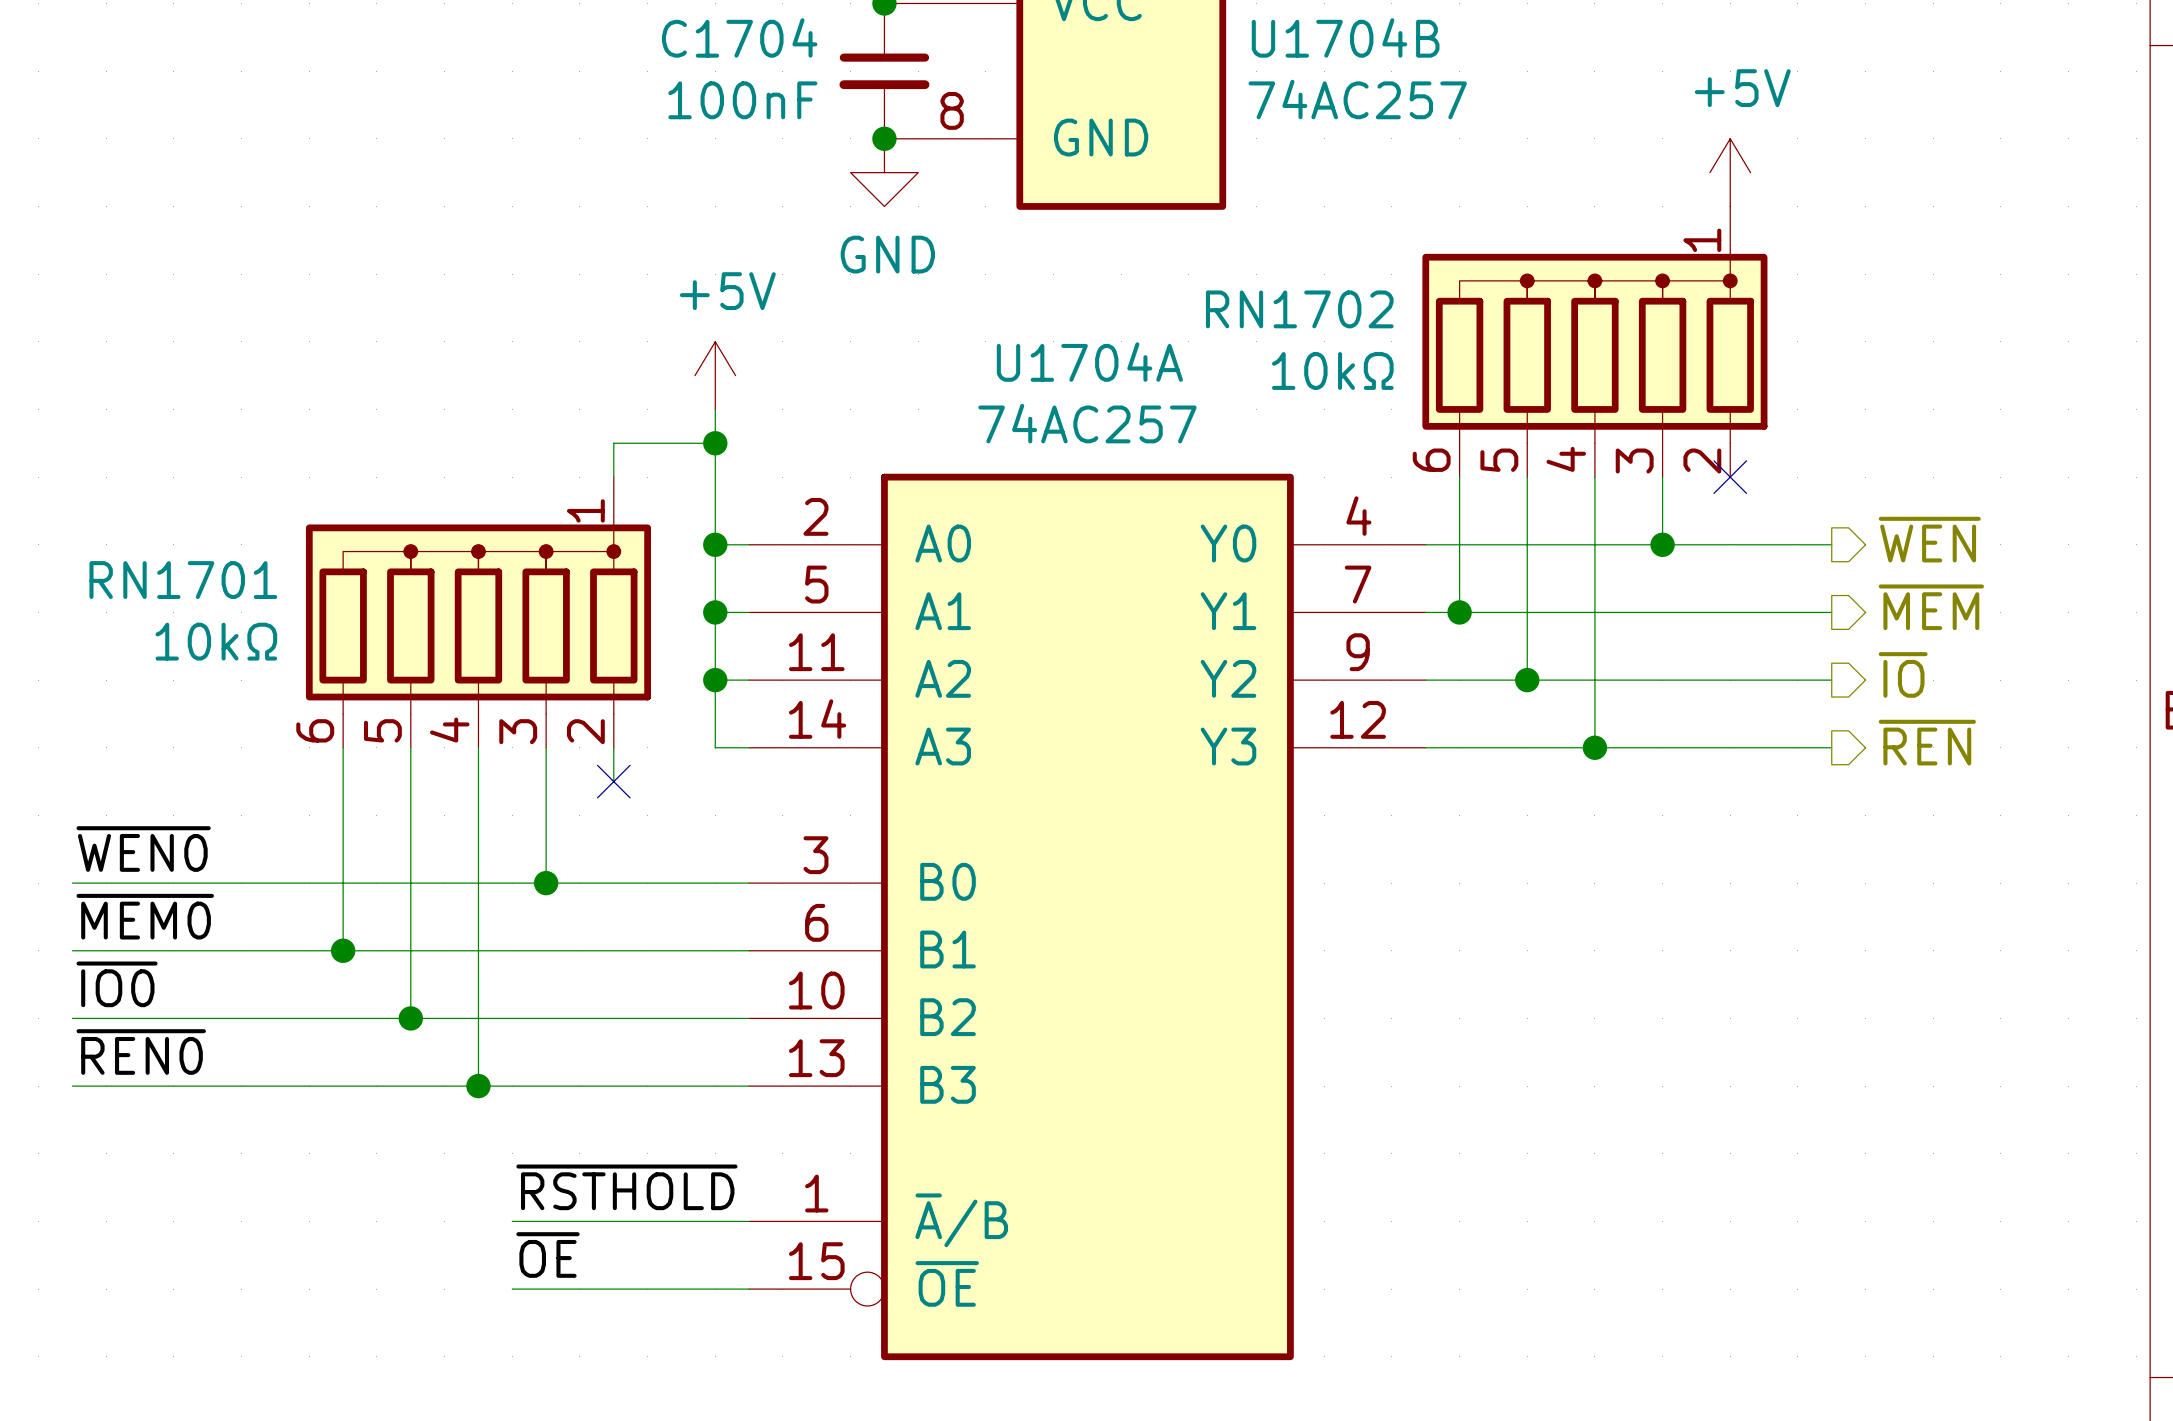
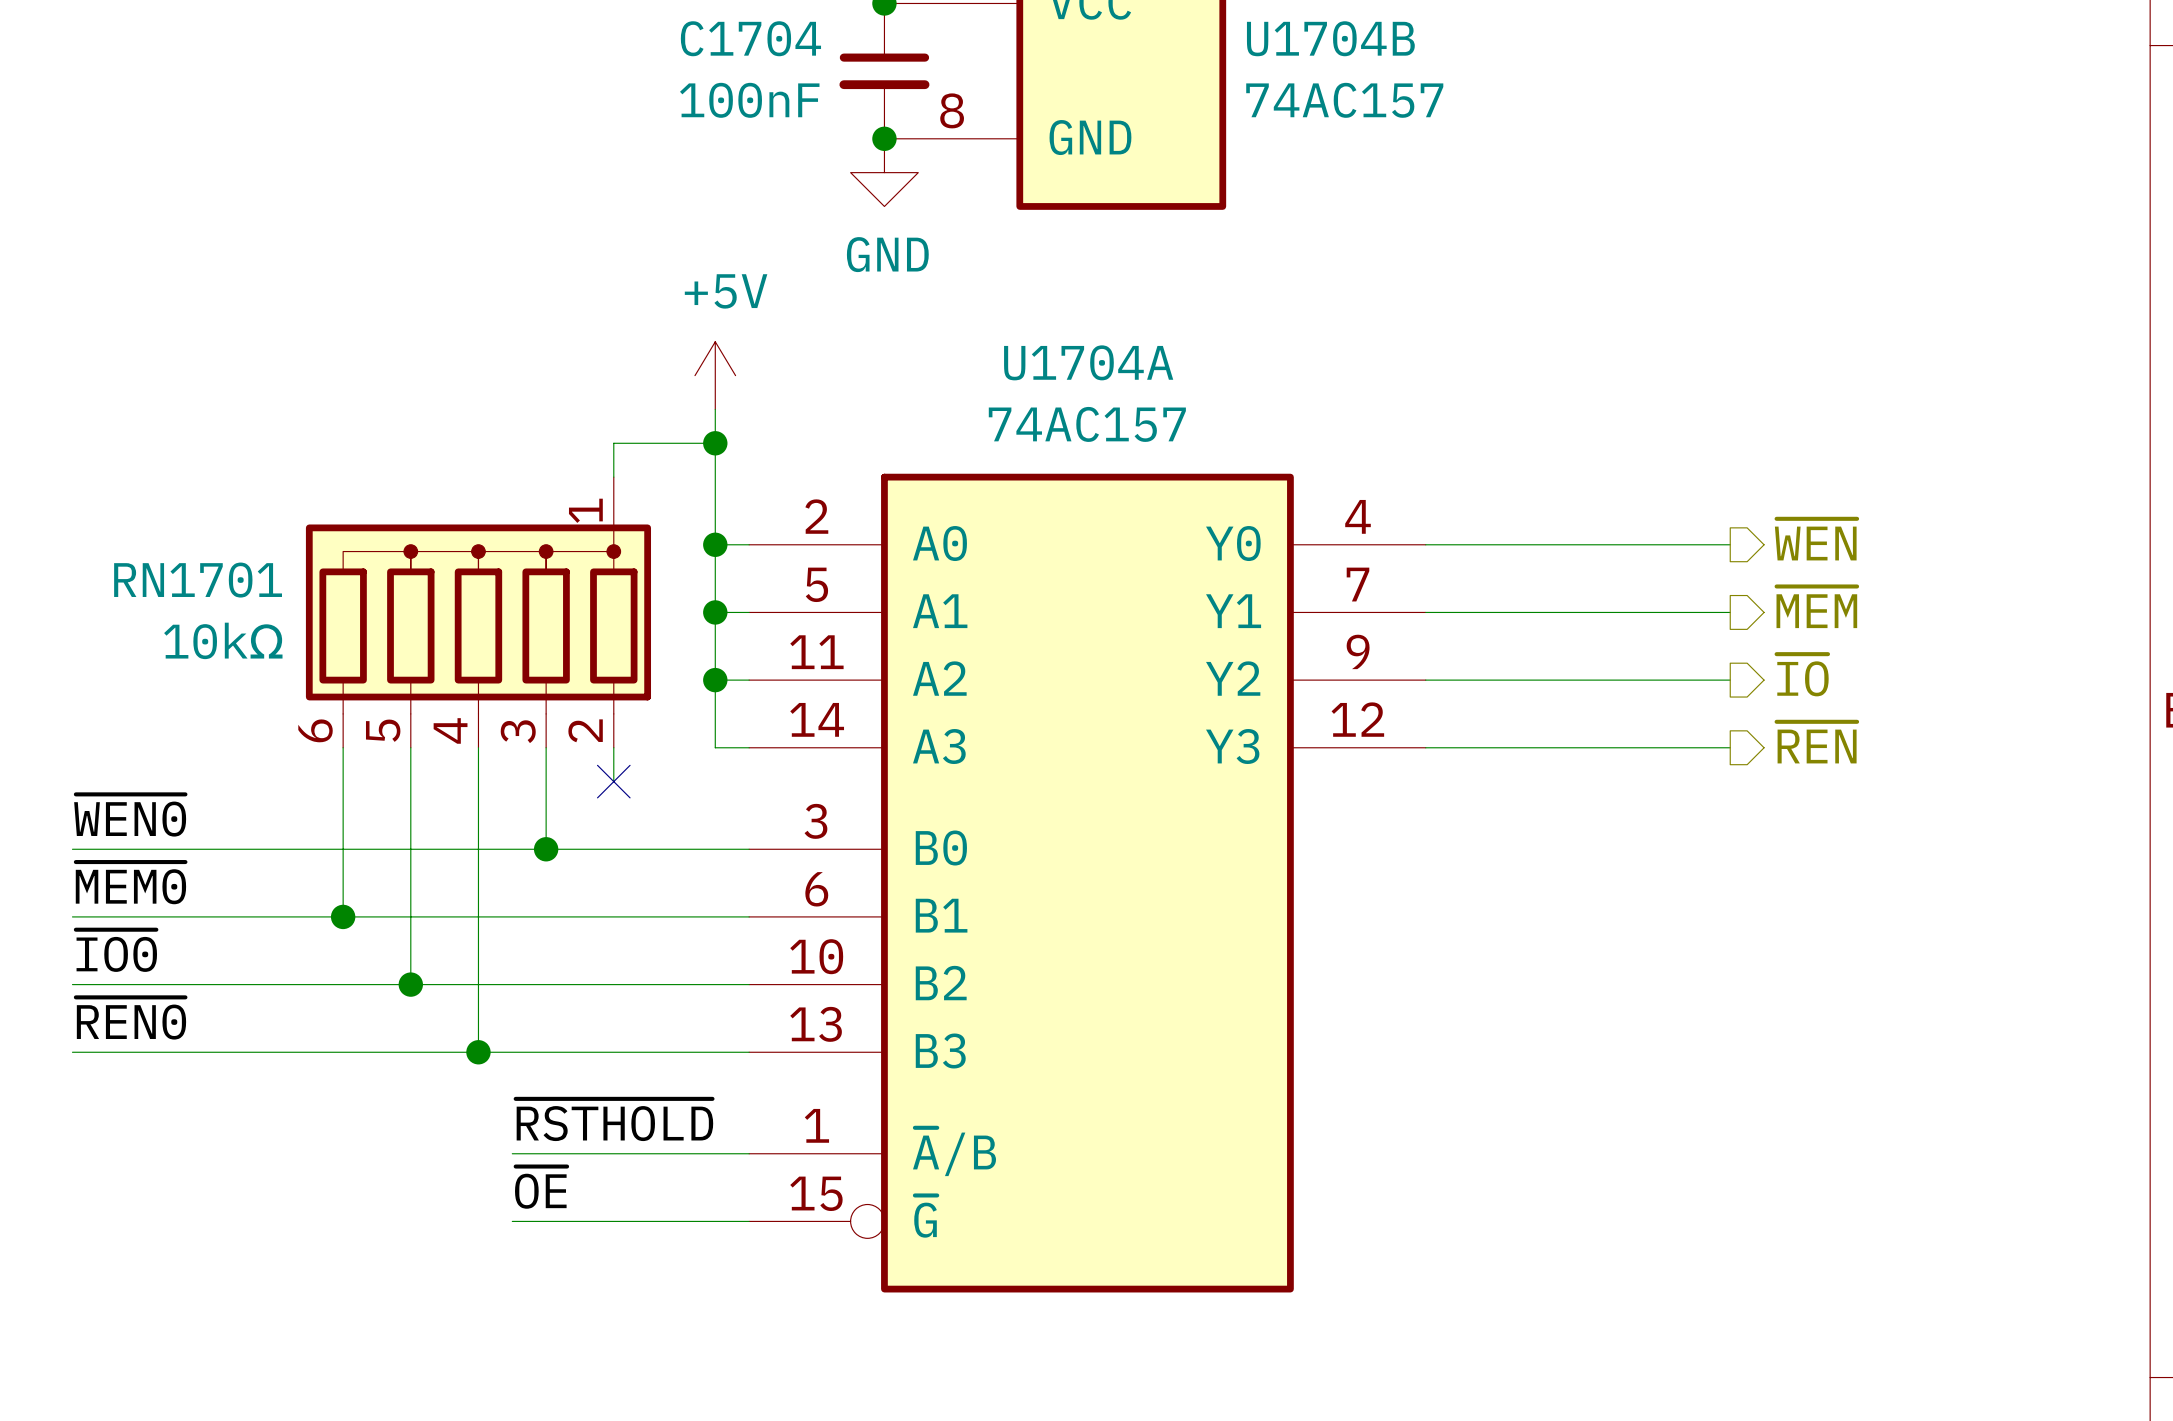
U1704B value: 74AC257 (1357, 99) -> 74AC157 (1344, 100)
power symbol: +5V (1730, 172) -> none
RN1702: 10kΩ (1594, 341) -> none
U1704A value: 74AC257 (1087, 423) -> 74AC157 (1087, 424)
U1704A symbol: [749, 473, 1426, 1361] -> [749, 473, 1426, 1293]
wire: (1459, 477) (1459, 612) -> none
wire: (1527, 477) (1527, 680) -> none
wire: (1594, 477) (1594, 747) -> none
wire: (1662, 477) (1662, 544) -> none
no-connect mark: (1730, 477) -> none
hierarchical label position: ~{WEN} (1929, 539) -> ~{WEN} (1815, 539)
junction: (1662, 544) -> none
wire: (1730, 544) (1831, 544) -> none
hierarchical label position: ~{MEM} (1931, 607) -> ~{MEM} (1816, 607)
junction: (1459, 612) -> none
wire: (1730, 612) (1831, 612) -> none
hierarchical label position: ~{IO} (1903, 674) -> ~{IO} (1802, 675)
junction: (1527, 680) -> none
wire: (1730, 680) (1831, 680) -> none
hierarchical label position: ~{REN} (1927, 742) -> ~{REN} (1816, 742)
junction: (1594, 747) -> none
wire: (1730, 747) (1831, 747) -> none
label position: ~{WEN0} (143, 849) -> ~{WEN0} (130, 815)
wire: (546, 849) (546, 883) -> none
wire: (72, 883) (749, 883) -> (72, 849) (749, 849)
junction position: (546, 883) -> (546, 849)
label position: ~{MEM0} (145, 916) -> ~{MEM0} (130, 883)
wire: (343, 916) (343, 950) -> none
wire: (72, 950) (749, 950) -> (72, 916) (749, 916)
junction position: (343, 950) -> (343, 916)
label position: ~{IO0} (117, 984) -> ~{IO0} (116, 950)
wire: (410, 984) (410, 1018) -> none
wire: (72, 1018) (749, 1018) -> (72, 984) (749, 984)
junction position: (410, 1018) -> (410, 984)
label position: ~{REN0} (141, 1052) -> ~{REN0} (130, 1018)
wire: (478, 1052) (478, 1086) -> none
wire: (72, 1086) (749, 1086) -> (72, 1052) (749, 1052)
junction position: (478, 1086) -> (478, 1052)
label: none -> ~{RSTHOLD} (614, 1119)
label: ~{RSTHOLD} (626, 1187) -> ~{OE} (541, 1187)
label: ~{OE} (547, 1255) -> none
wire: (512, 1289) (749, 1289) -> (512, 1153) (749, 1153)

